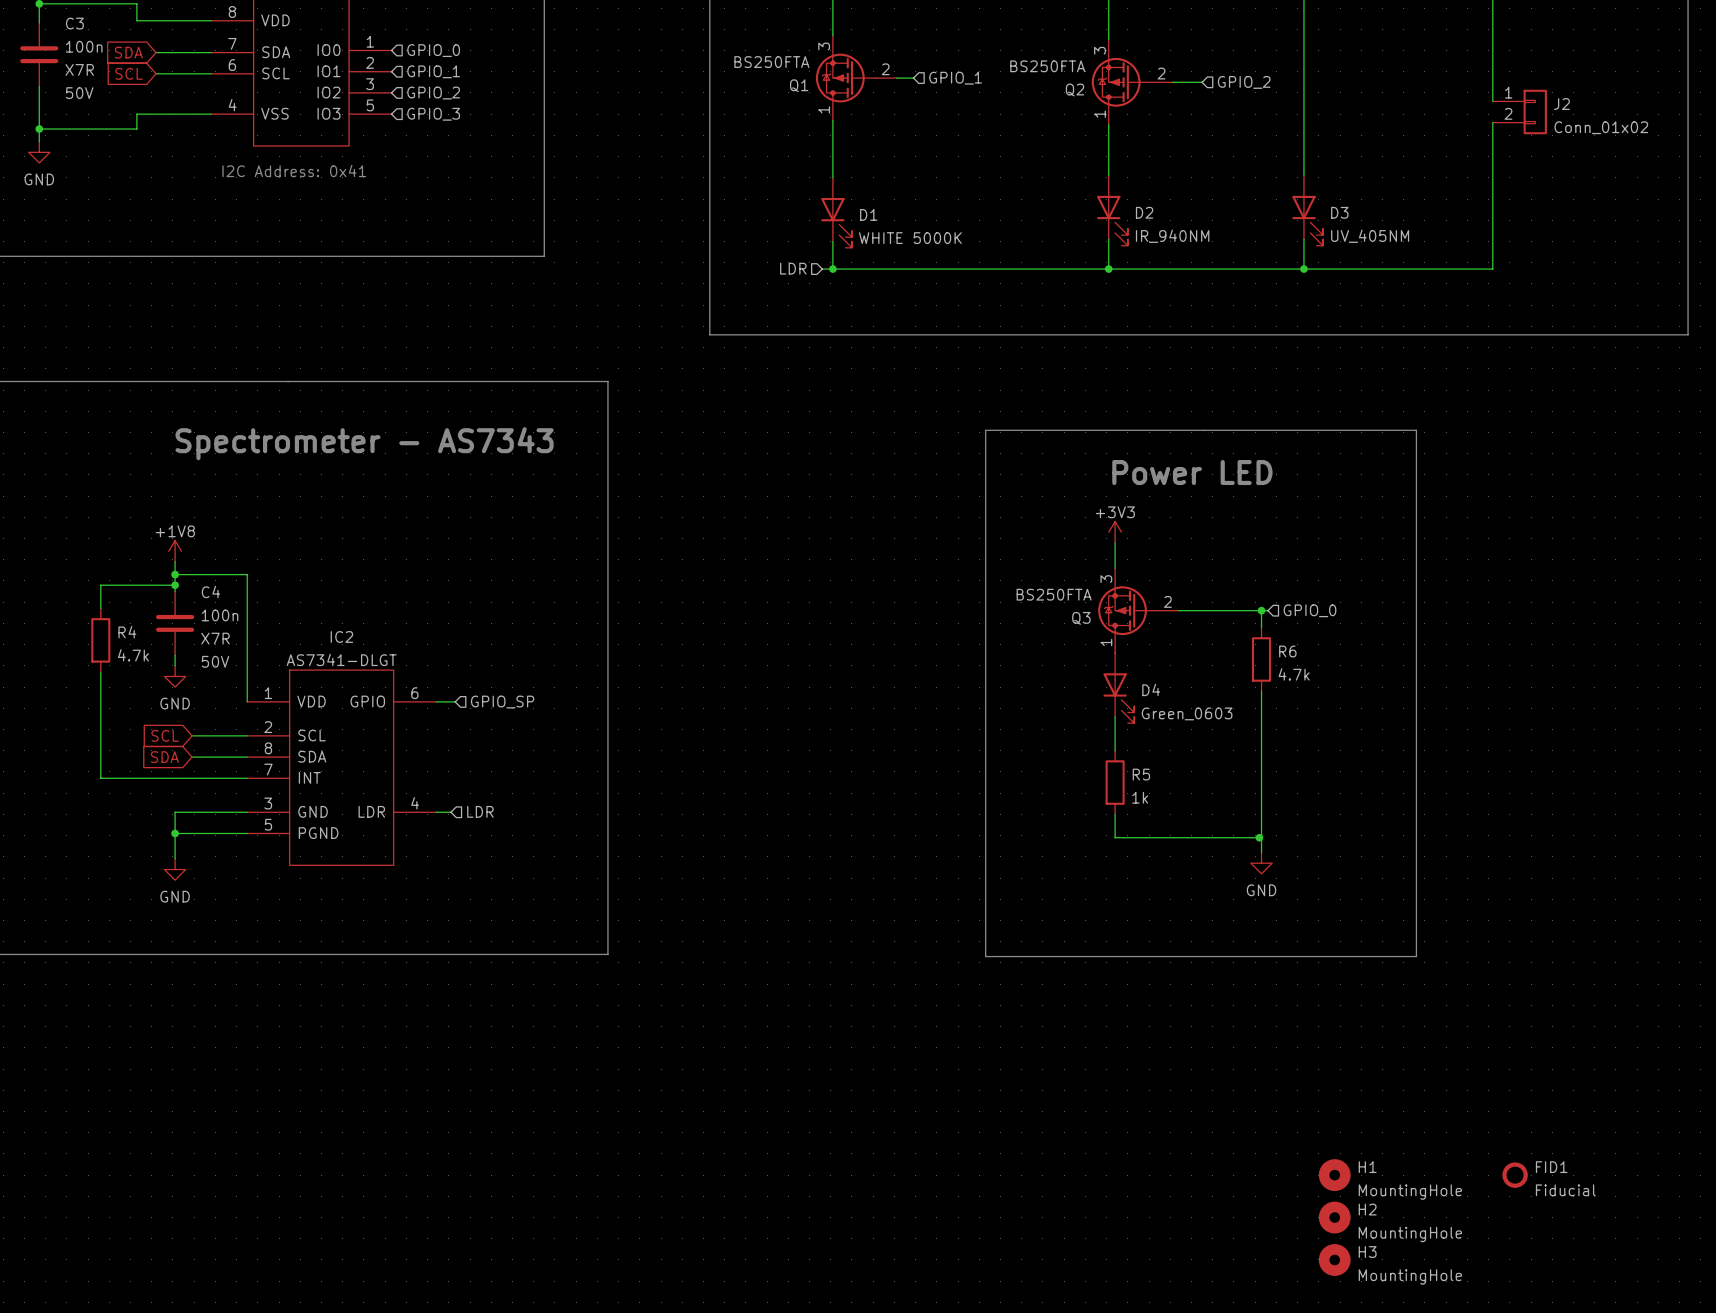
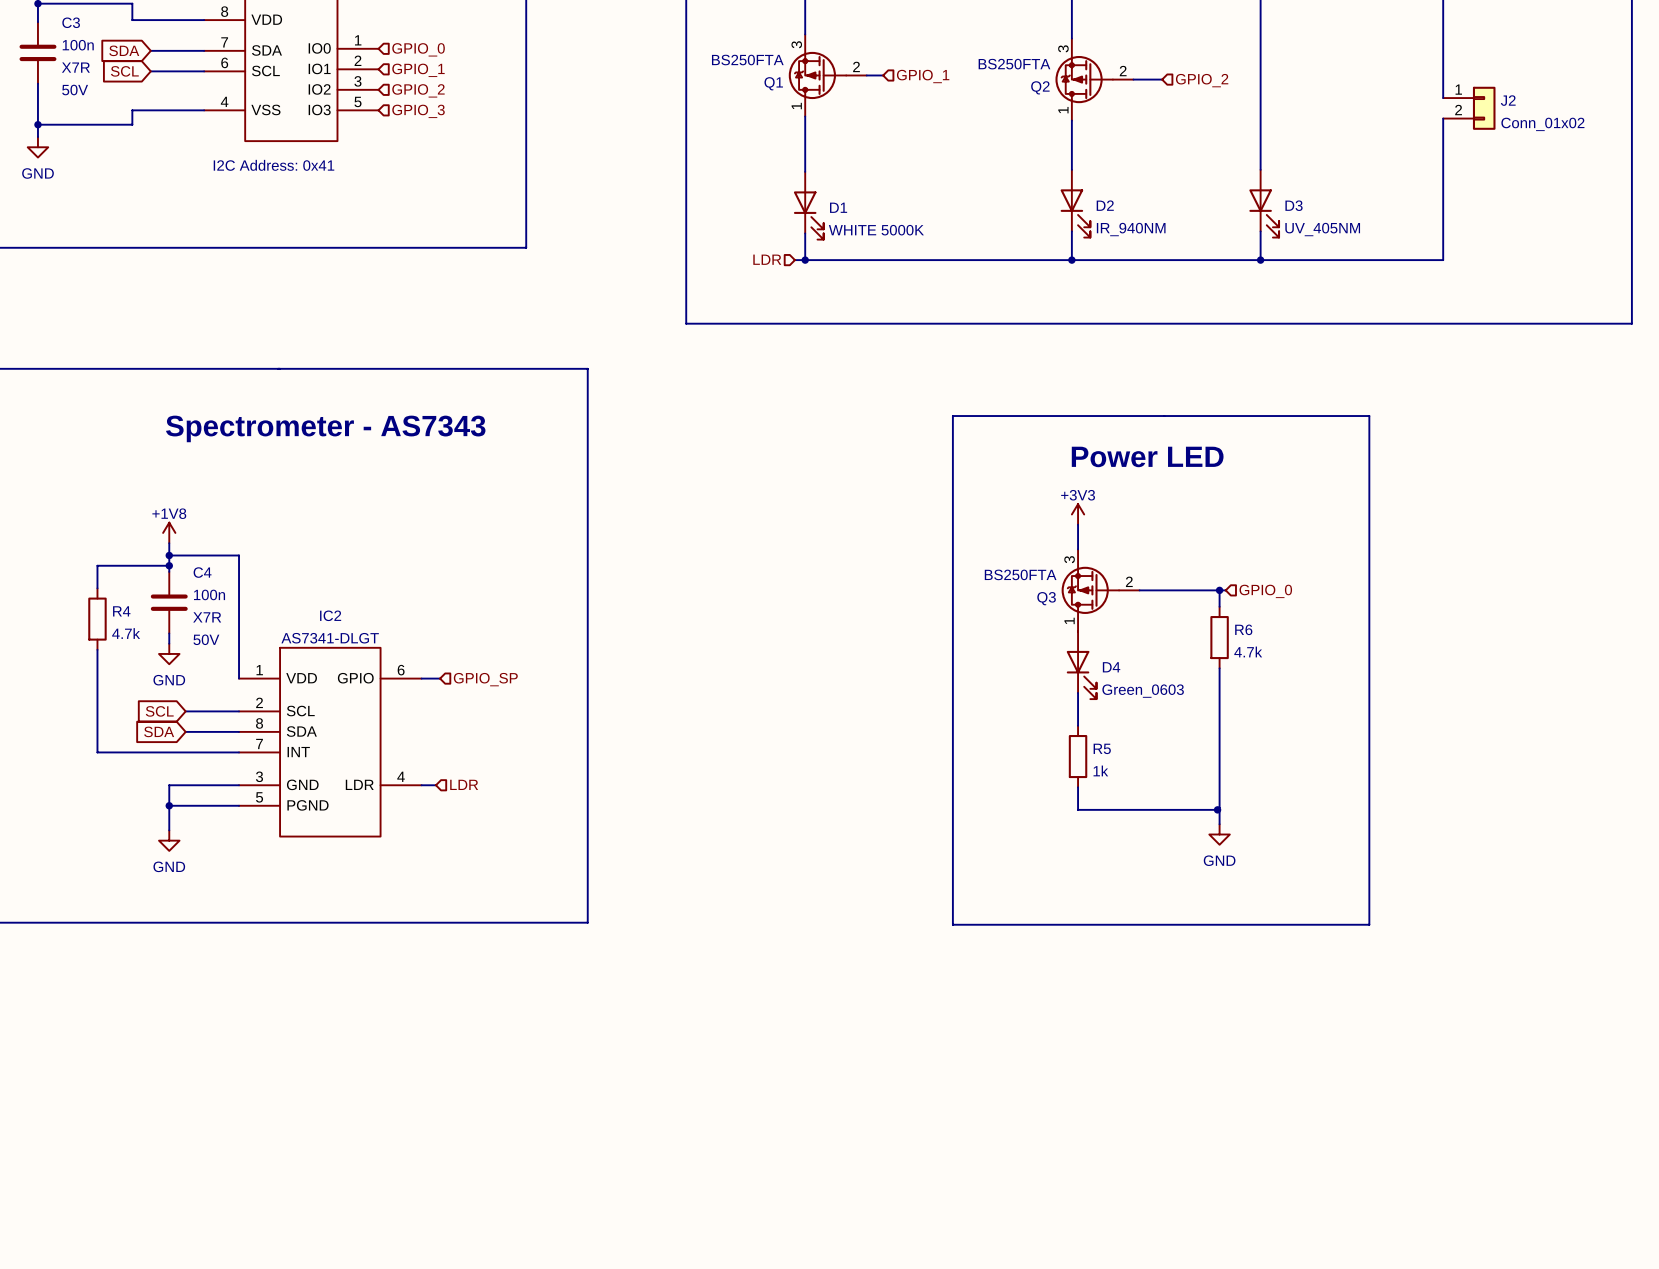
H1: MountingHole (1334, 1175) -> none
FID1: Fiducial (1515, 1175) -> none
H2: MountingHole (1334, 1217) -> none
H3: MountingHole (1334, 1259) -> none

